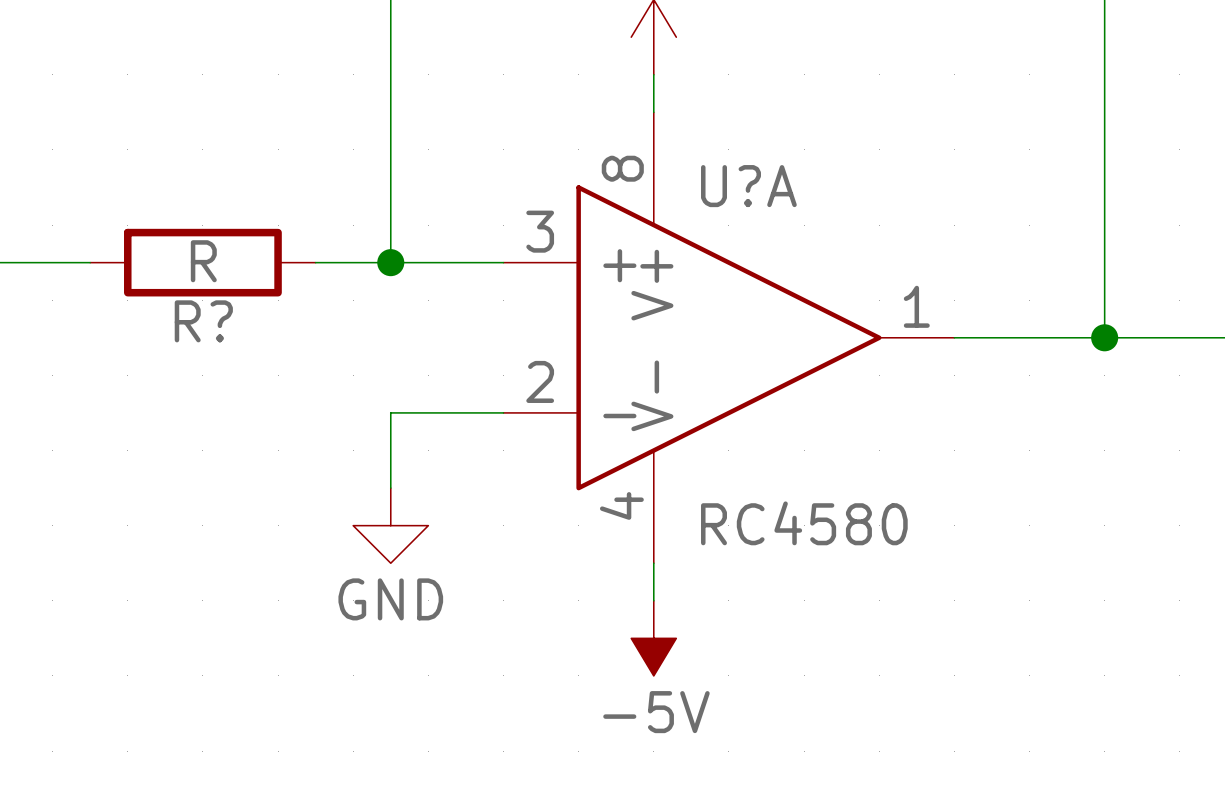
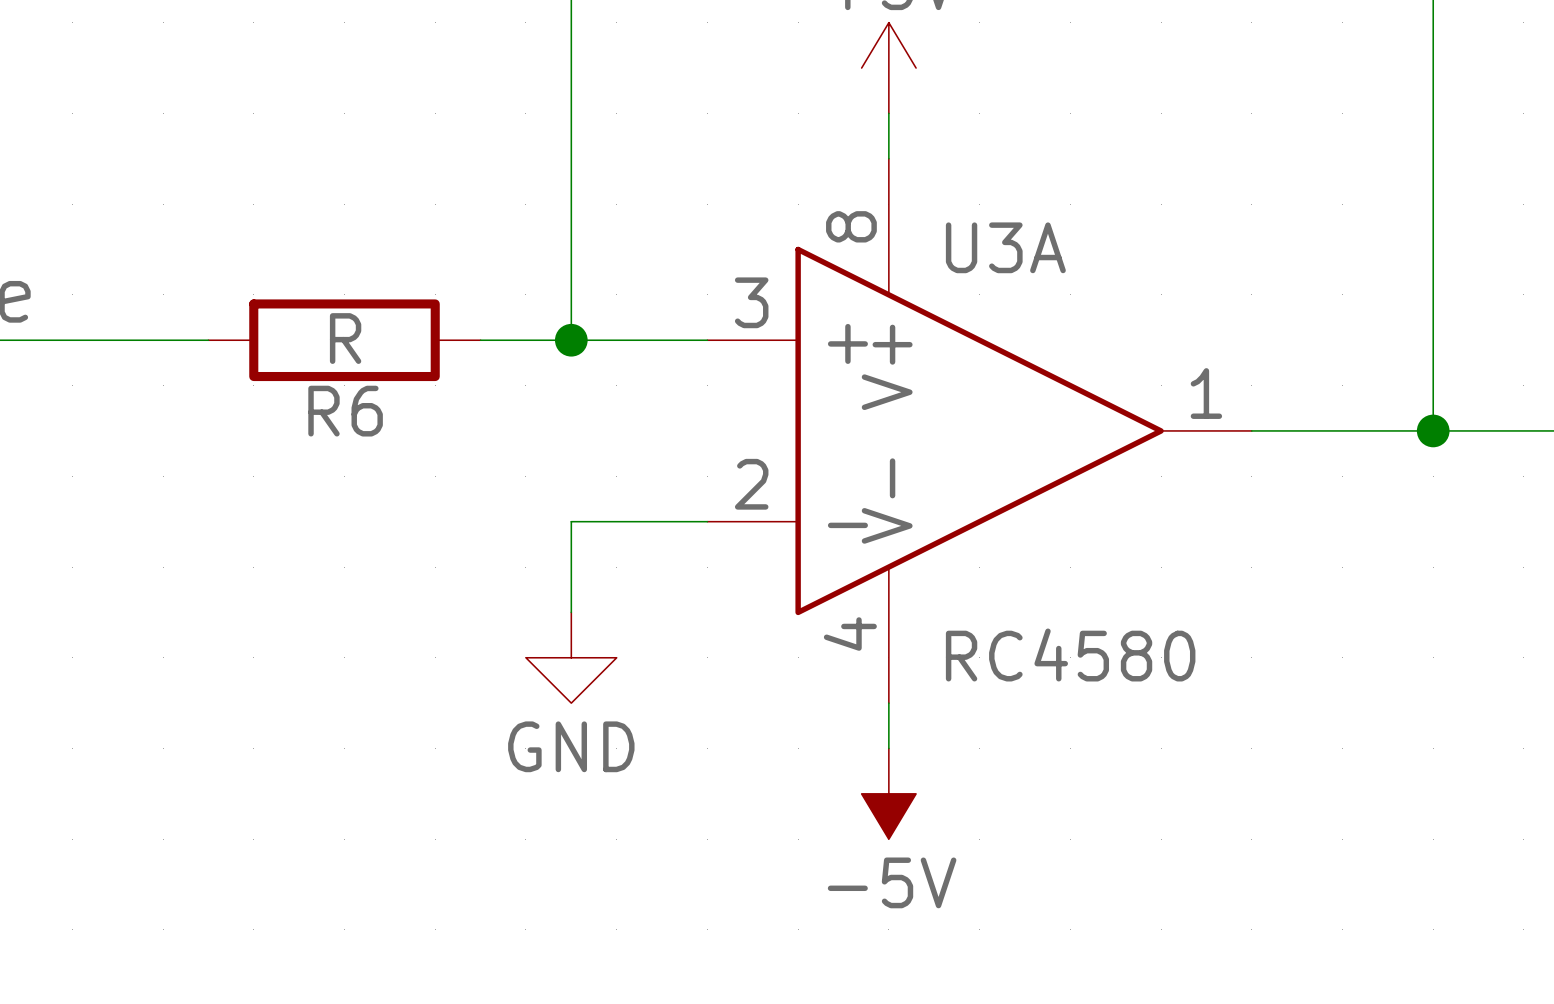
U?A name: U?A (748, 186) -> U3A (1005, 247)
R? name: R? (203, 321) -> R6 (345, 411)

